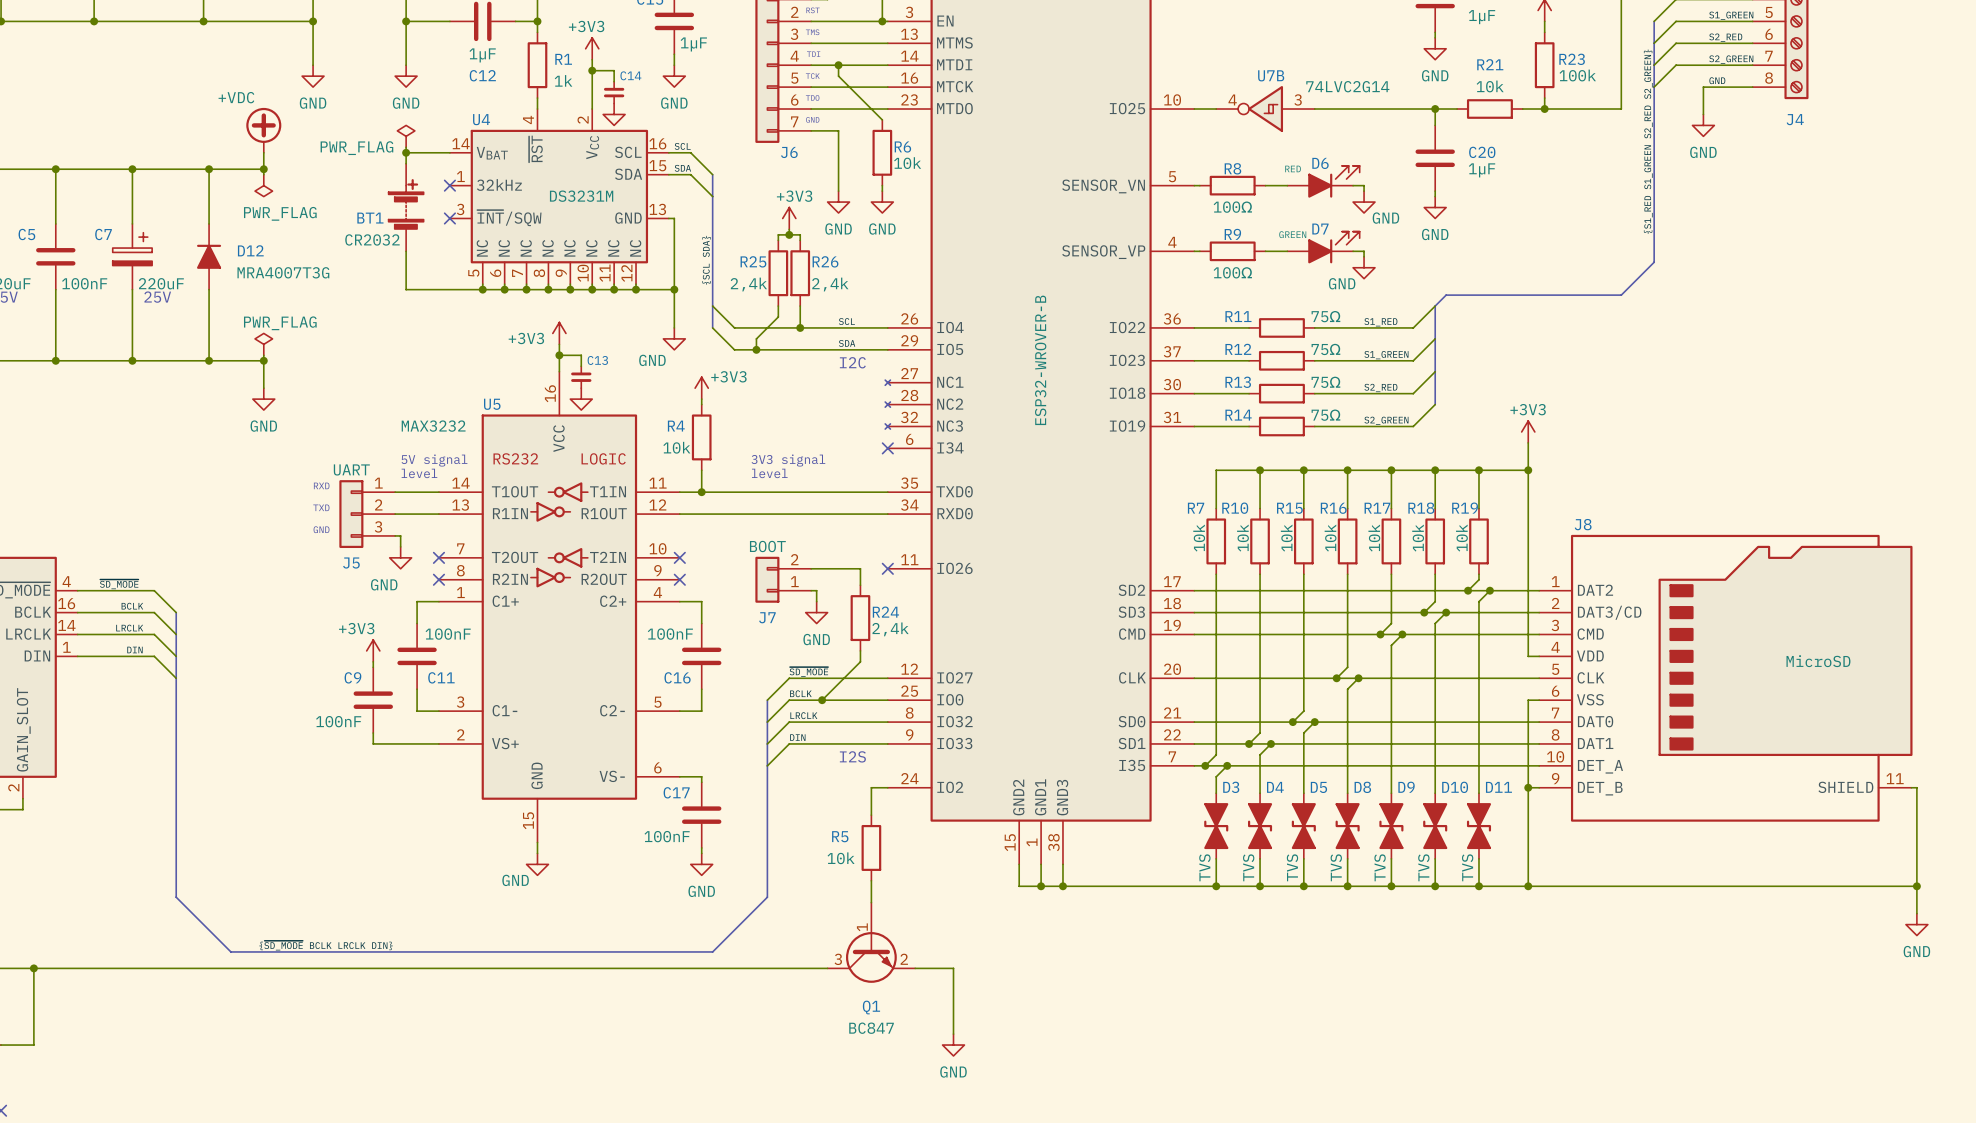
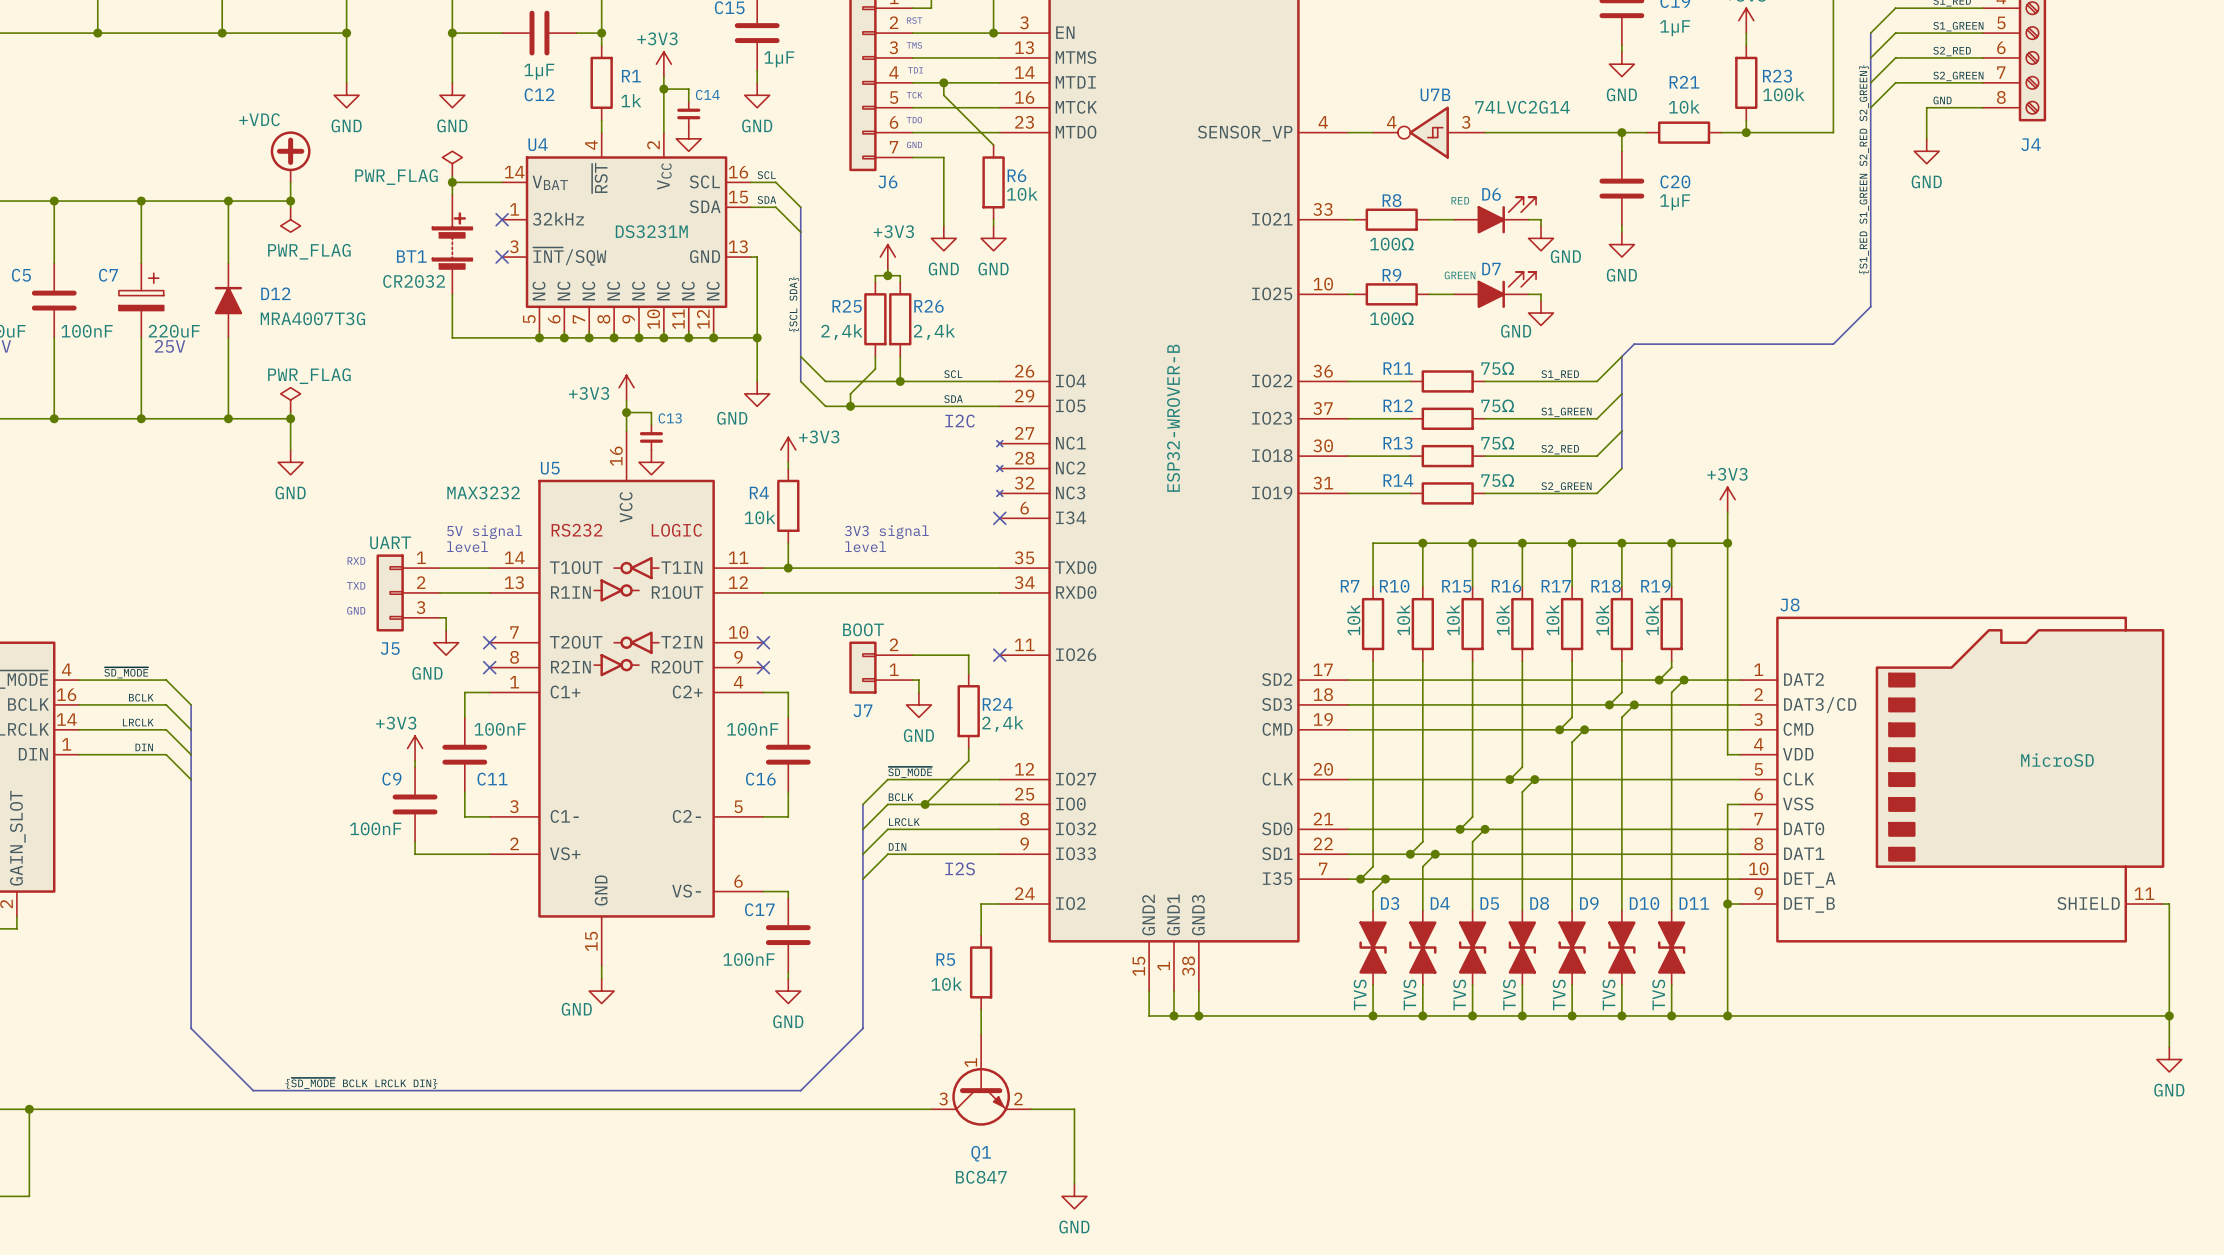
part pin number: 10 (1172, 99) -> 4 (1323, 122)
part pin name: IO25 (1127, 108) -> SENSOR_VP (1245, 133)
part pin number: 5 (1172, 176) -> 33 (1322, 209)
part pin name: SENSOR_VN (1103, 186) -> IO21 (1272, 219)
part pin number: 4 (1172, 242) -> 10 (1323, 284)
part pin name: SENSOR_VP (1103, 252) -> IO25 (1272, 293)

